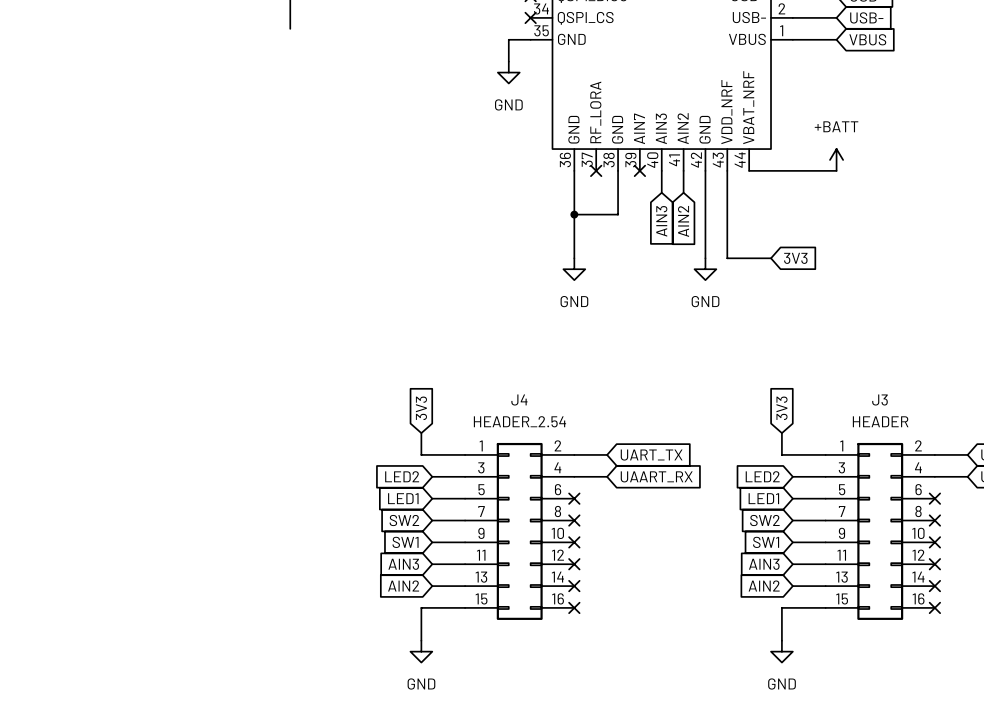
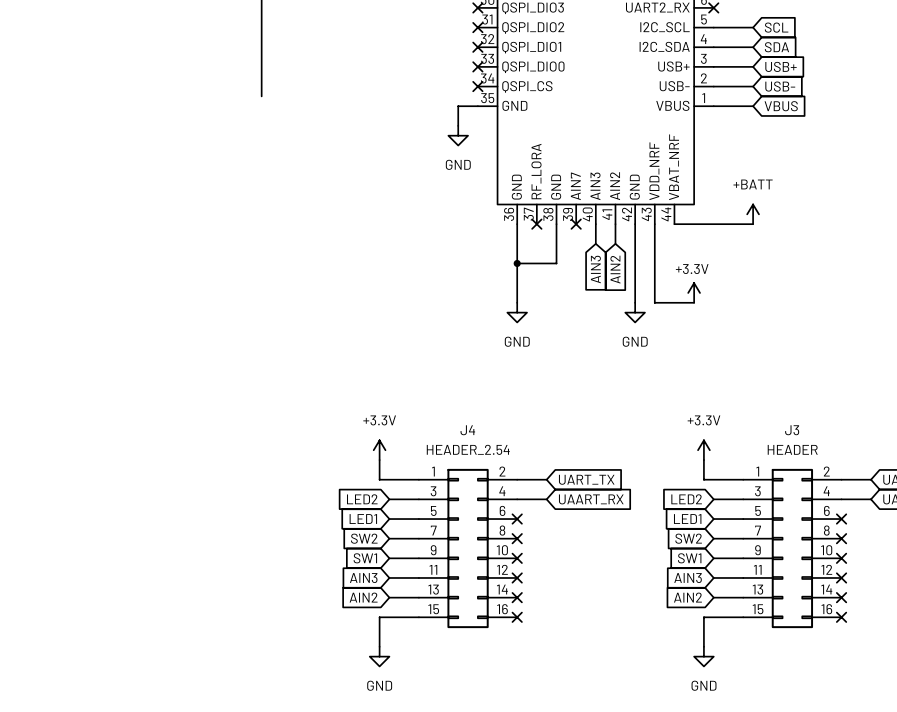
power symbol: none -> +3.3V (694, 292)
global label: 3V3 (795, 258) -> none
global label: 3V3 (421, 408) -> none
global label: 3V3 (781, 408) -> none
power symbol: none -> +3.3V (379, 450)
power symbol: none -> +3.3V (703, 450)

